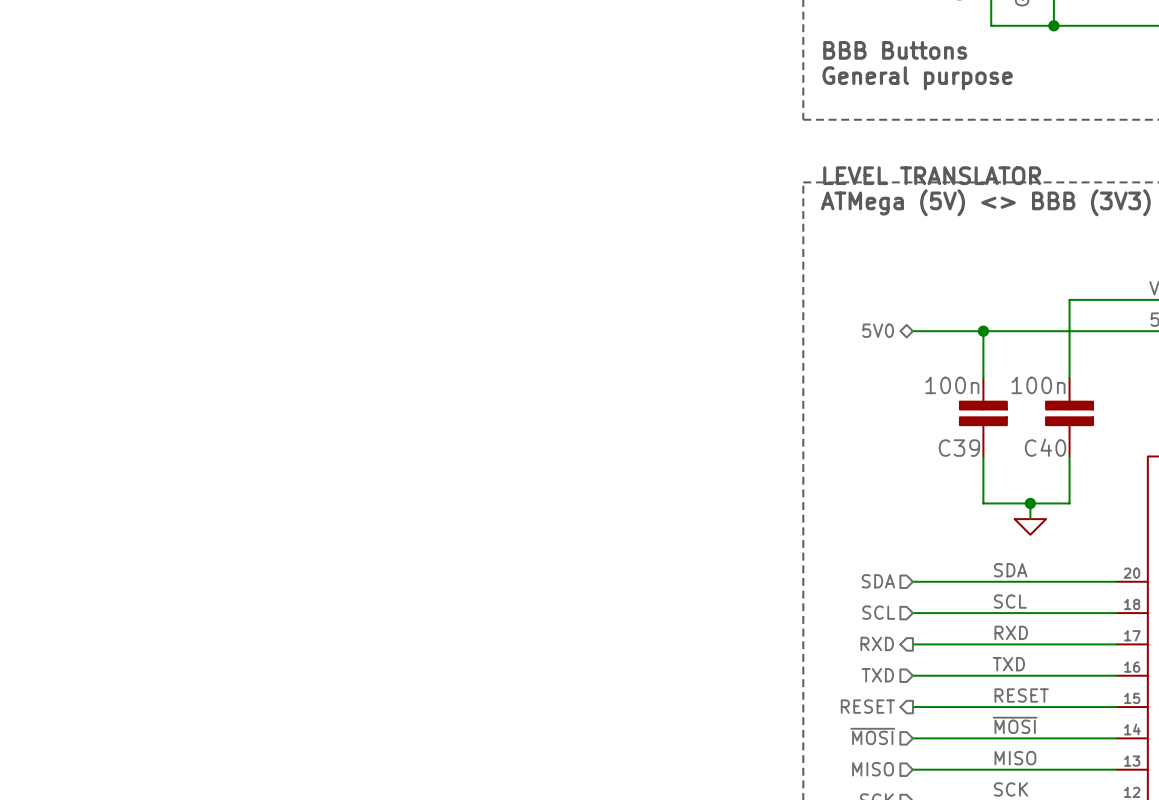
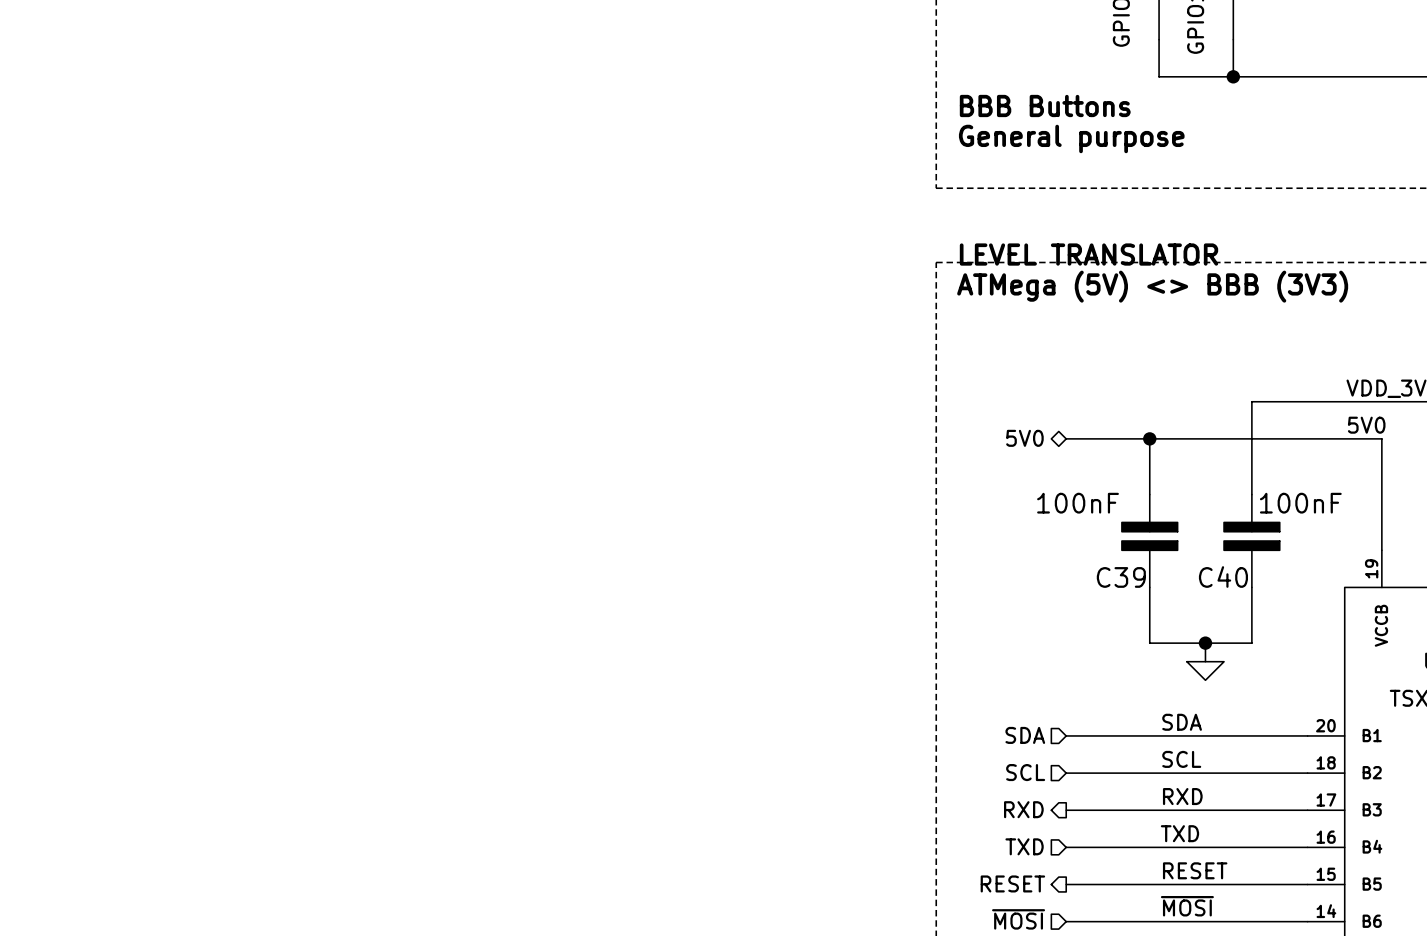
C39 value: 100n (952, 385) -> 100nF (1078, 503)
C40 value: 100n (1038, 385) -> 100nF (1300, 503)

